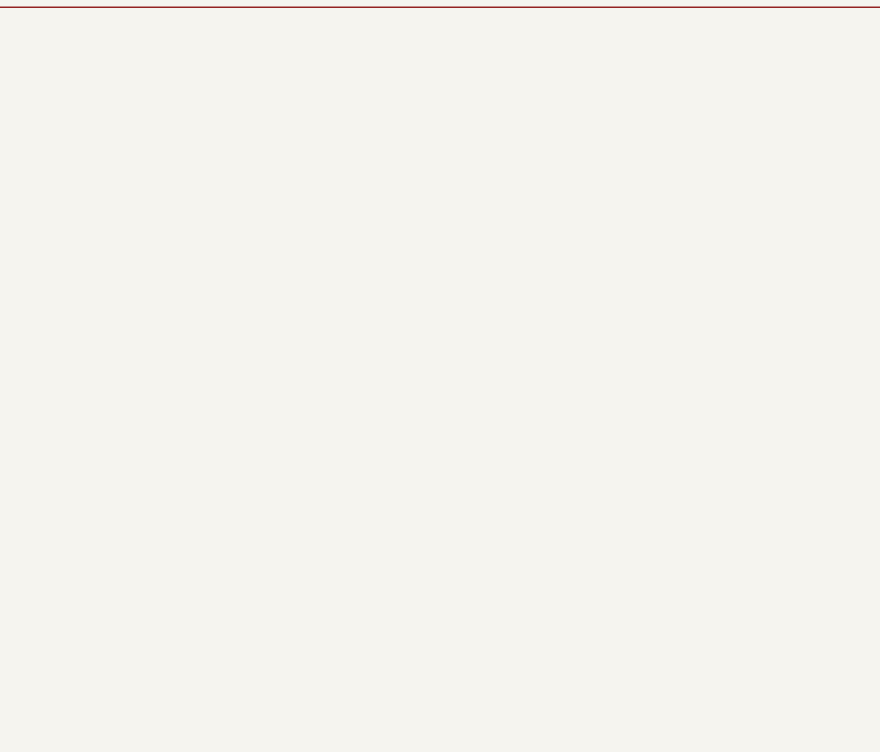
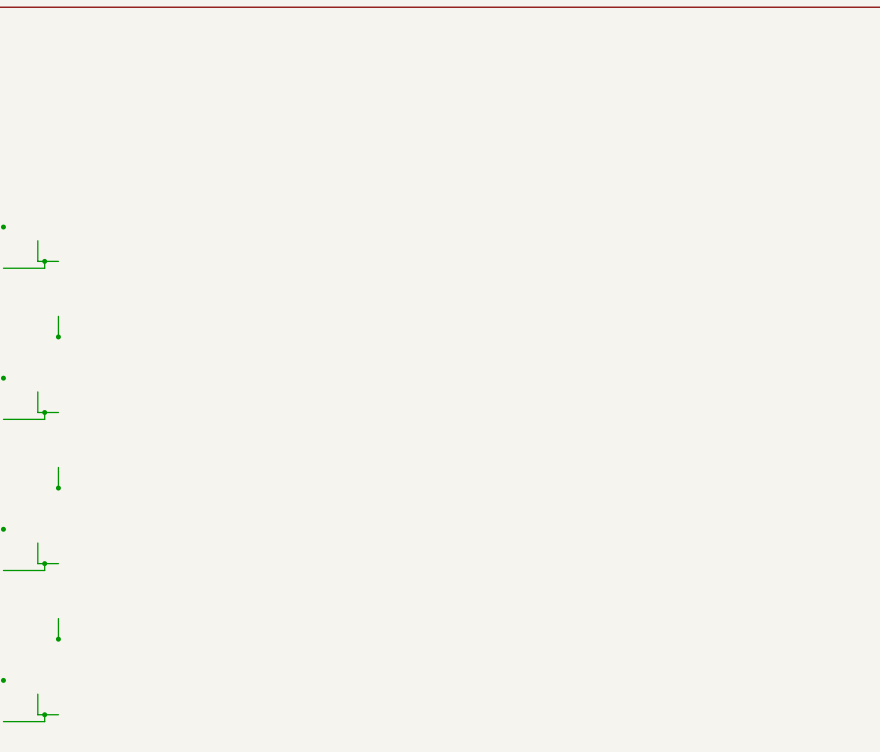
junction: none -> (3, 227)
wire: none -> (37, 240) (37, 261) (58, 261)
wire: none -> (44, 261) (44, 268) (3, 268)
junction: none -> (44, 261)
wire: none -> (58, 316) (58, 336)
junction: none -> (58, 336)
junction: none -> (3, 378)
wire: none -> (37, 391) (37, 412) (58, 412)
wire: none -> (44, 412) (44, 419) (3, 419)
junction: none -> (44, 412)
wire: none -> (58, 467) (58, 488)
junction: none -> (58, 488)
junction: none -> (3, 529)
wire: none -> (37, 543) (37, 563) (58, 563)
wire: none -> (44, 563) (44, 570) (3, 570)
junction: none -> (44, 563)
wire: none -> (58, 618) (58, 639)
junction: none -> (58, 639)
junction: none -> (3, 680)
wire: none -> (37, 694) (37, 714) (58, 714)
wire: none -> (44, 714) (44, 721) (3, 721)
junction: none -> (44, 714)

